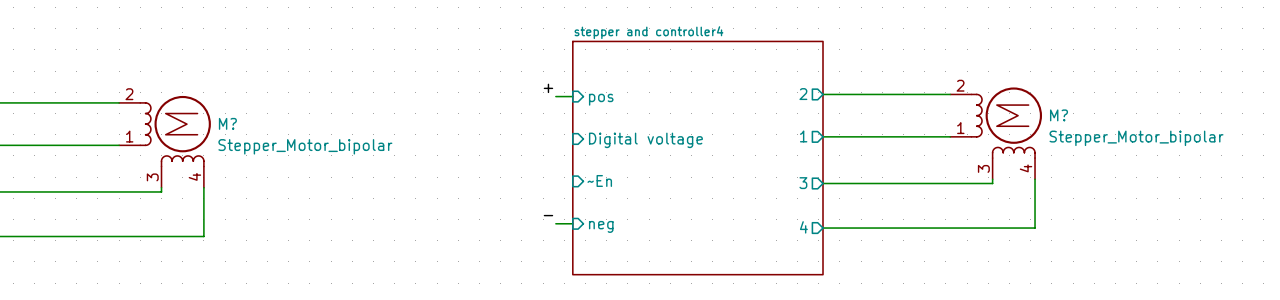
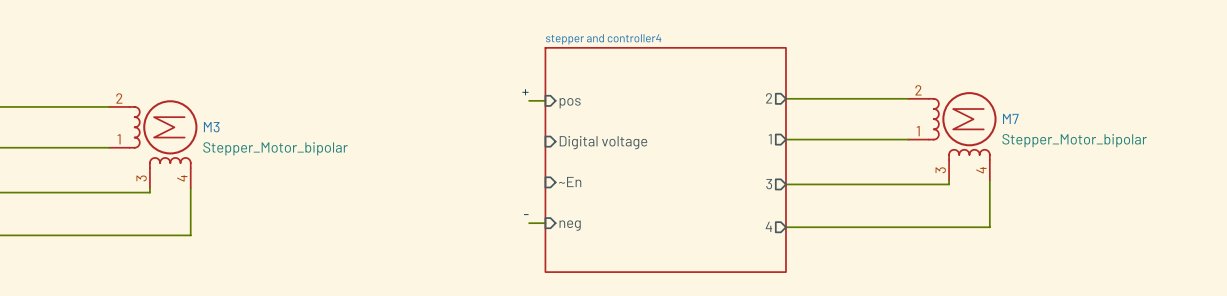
M? name: M? (1059, 115) -> M7 (1010, 118)
M? name: M? (227, 123) -> M3 (211, 127)

